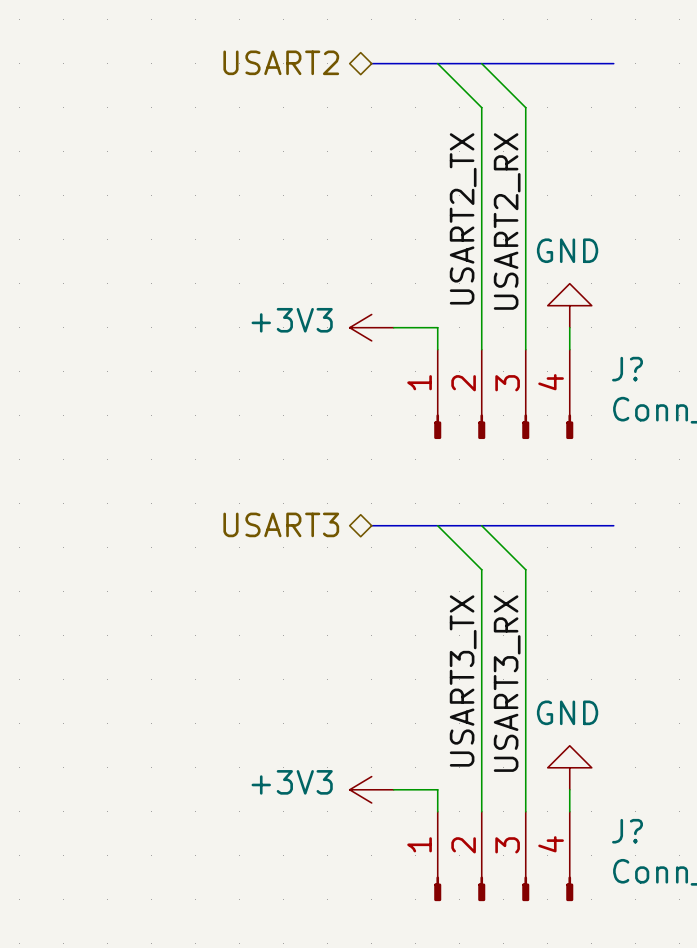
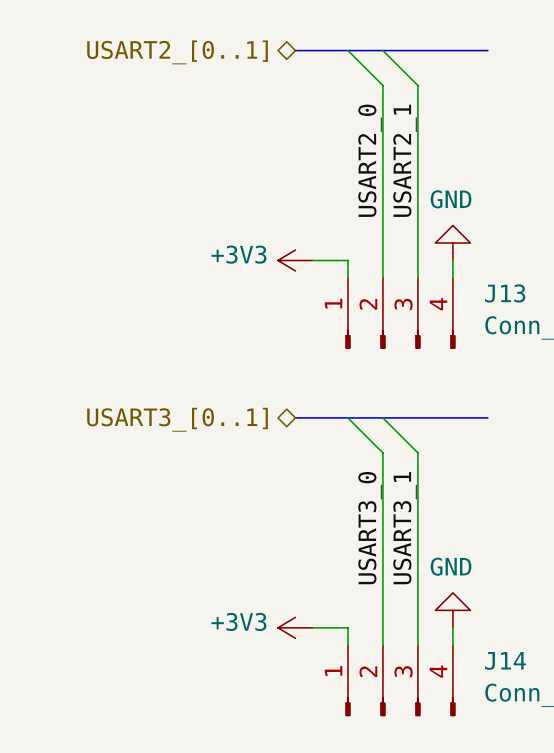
hierarchical label: USART2 (281, 62) -> USART2_[0..1] (177, 52)
label: USART2_TX (463, 218) -> USART2_0 (370, 160)
label: USART2_RX (507, 221) -> USART2_1 (405, 160)
J? name: J? (627, 369) -> J13 (505, 293)
hierarchical label: USART3 (281, 524) -> USART3_[0..1] (177, 419)
label: USART3_TX (463, 680) -> USART3_0 (370, 528)
label: USART3_RX (507, 683) -> USART3_1 (405, 528)
J? name: J? (627, 831) -> J14 (505, 660)

